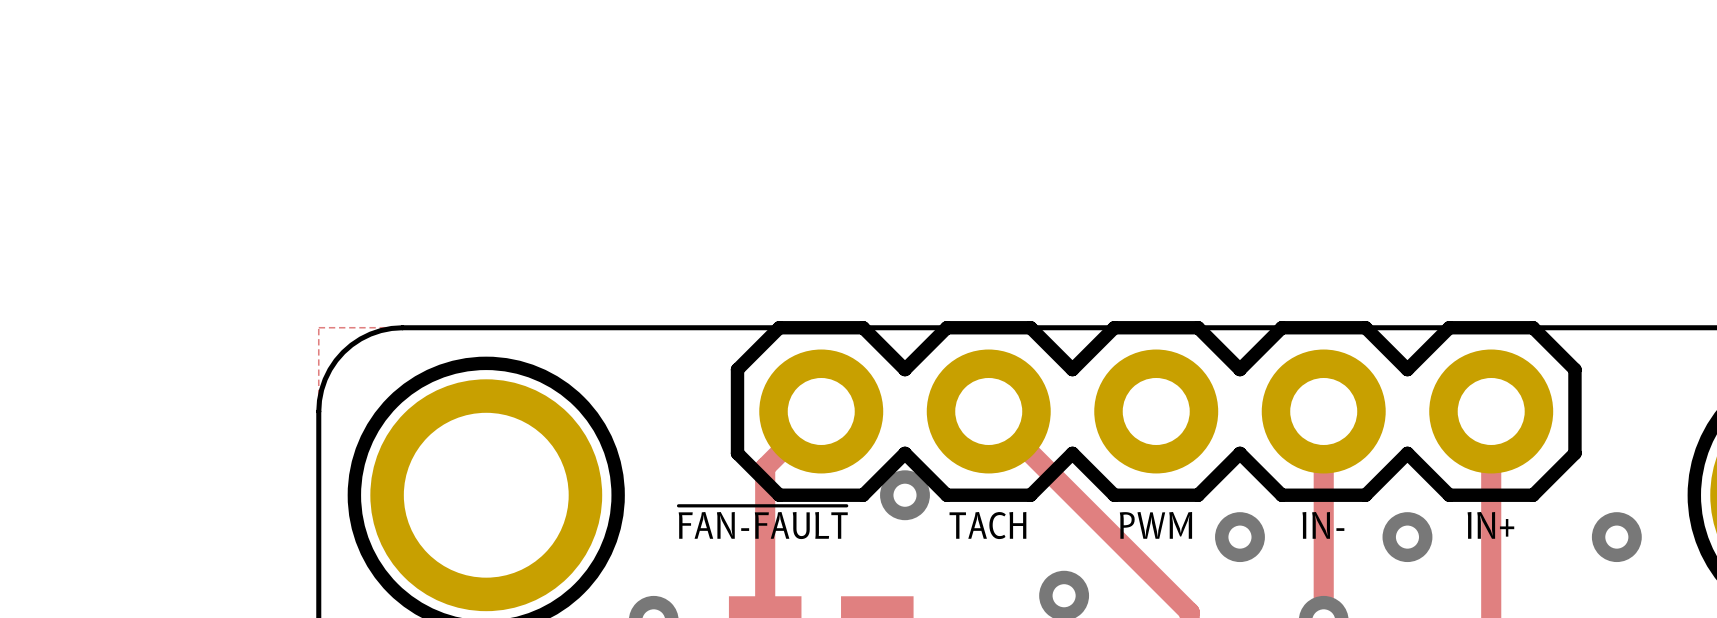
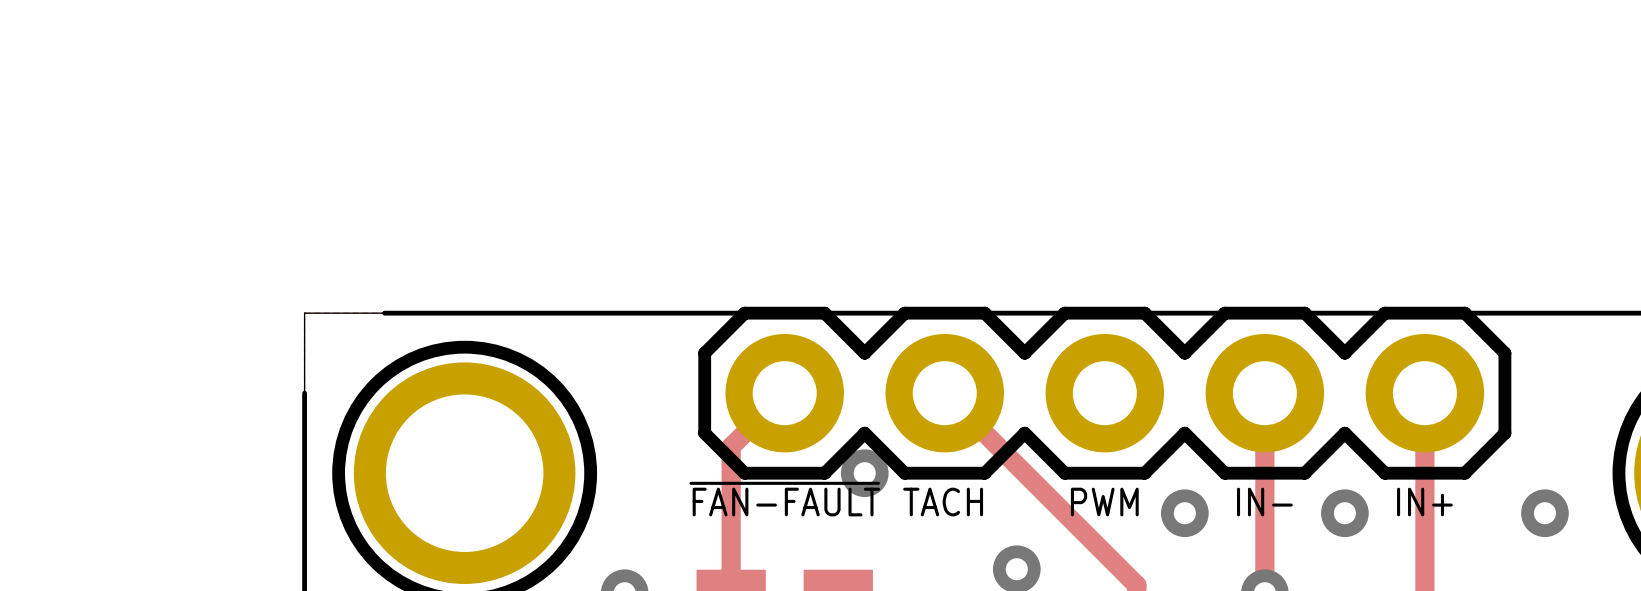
board edge: (402, 327) (370, 334) (343, 352) (325, 379) (318, 411) -> (384, 313) (304, 313) (304, 393)
text position: ~{FAN-FAULT} (763, 522) -> ~{FAN-FAULT} (784, 499)

